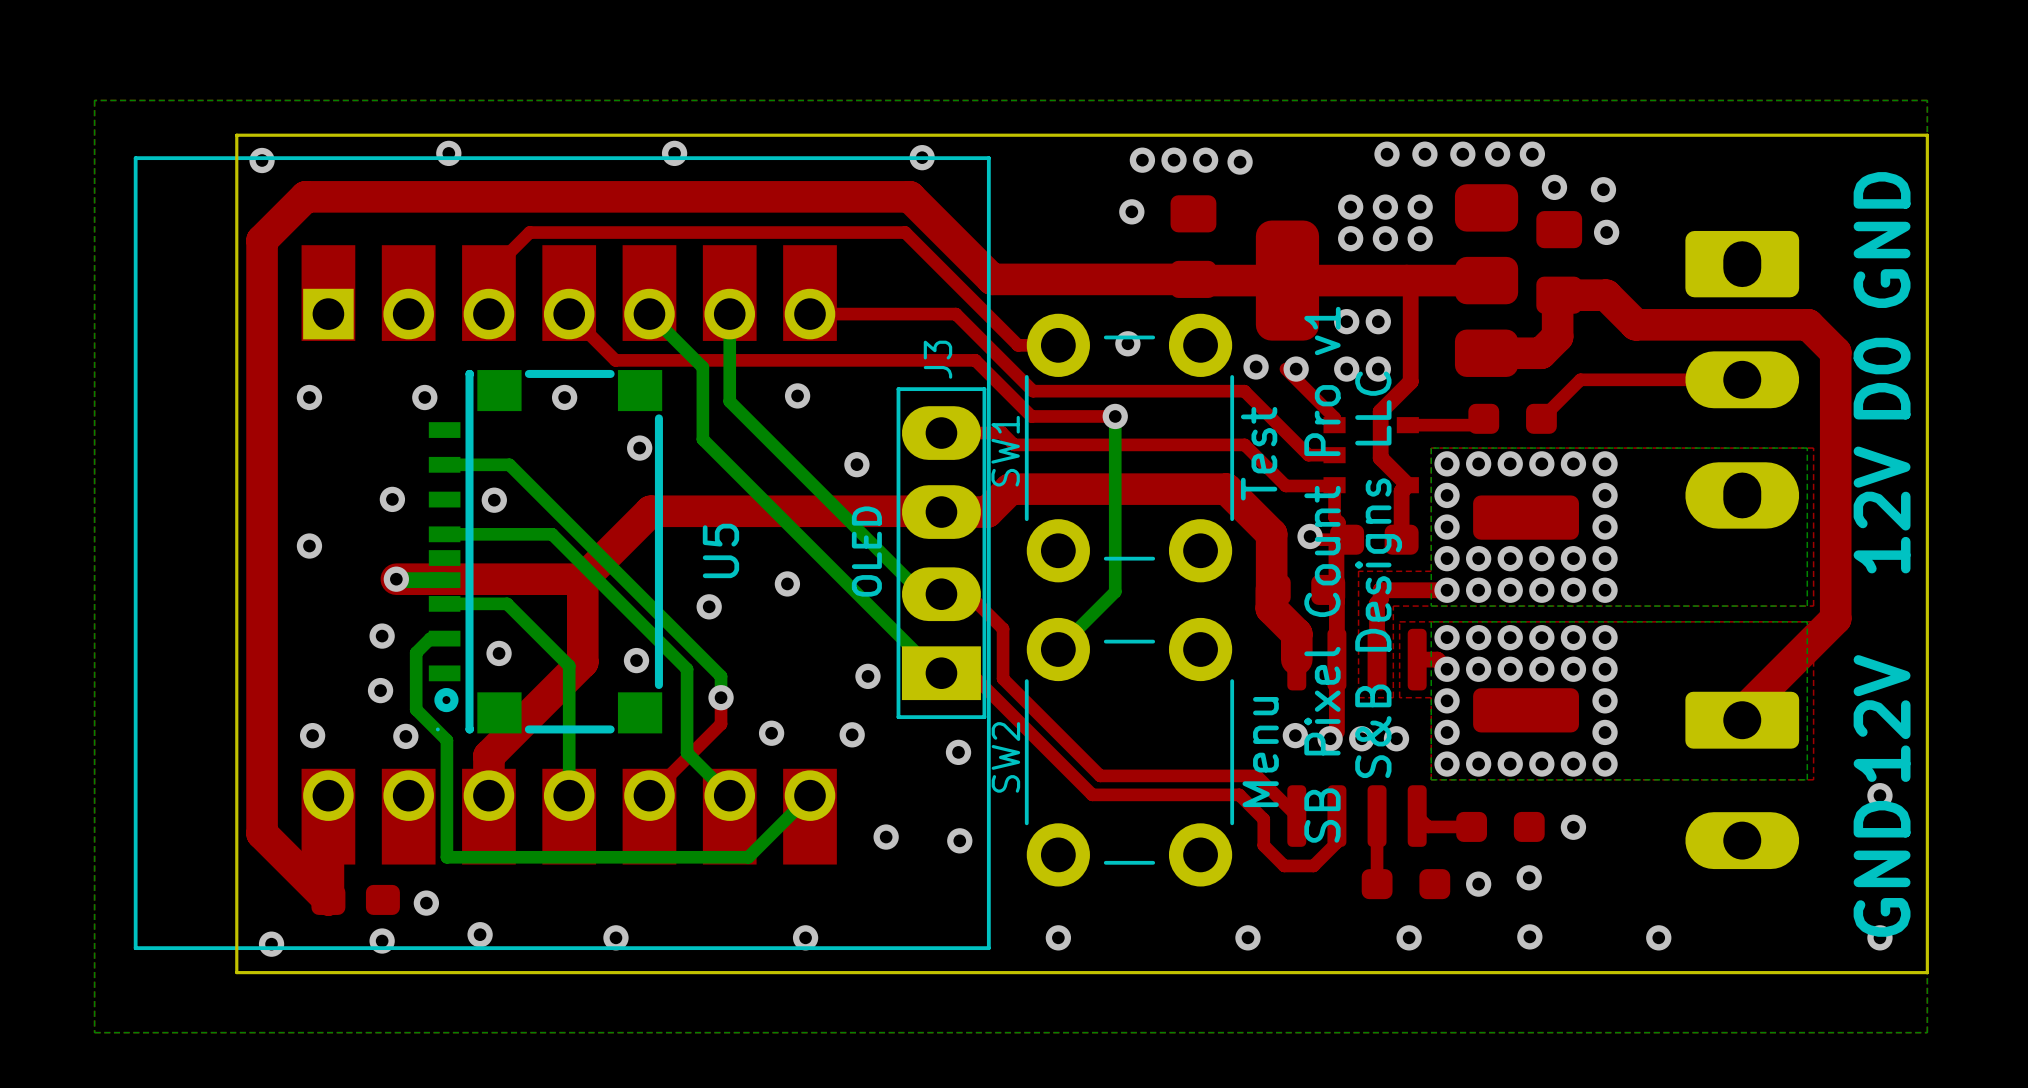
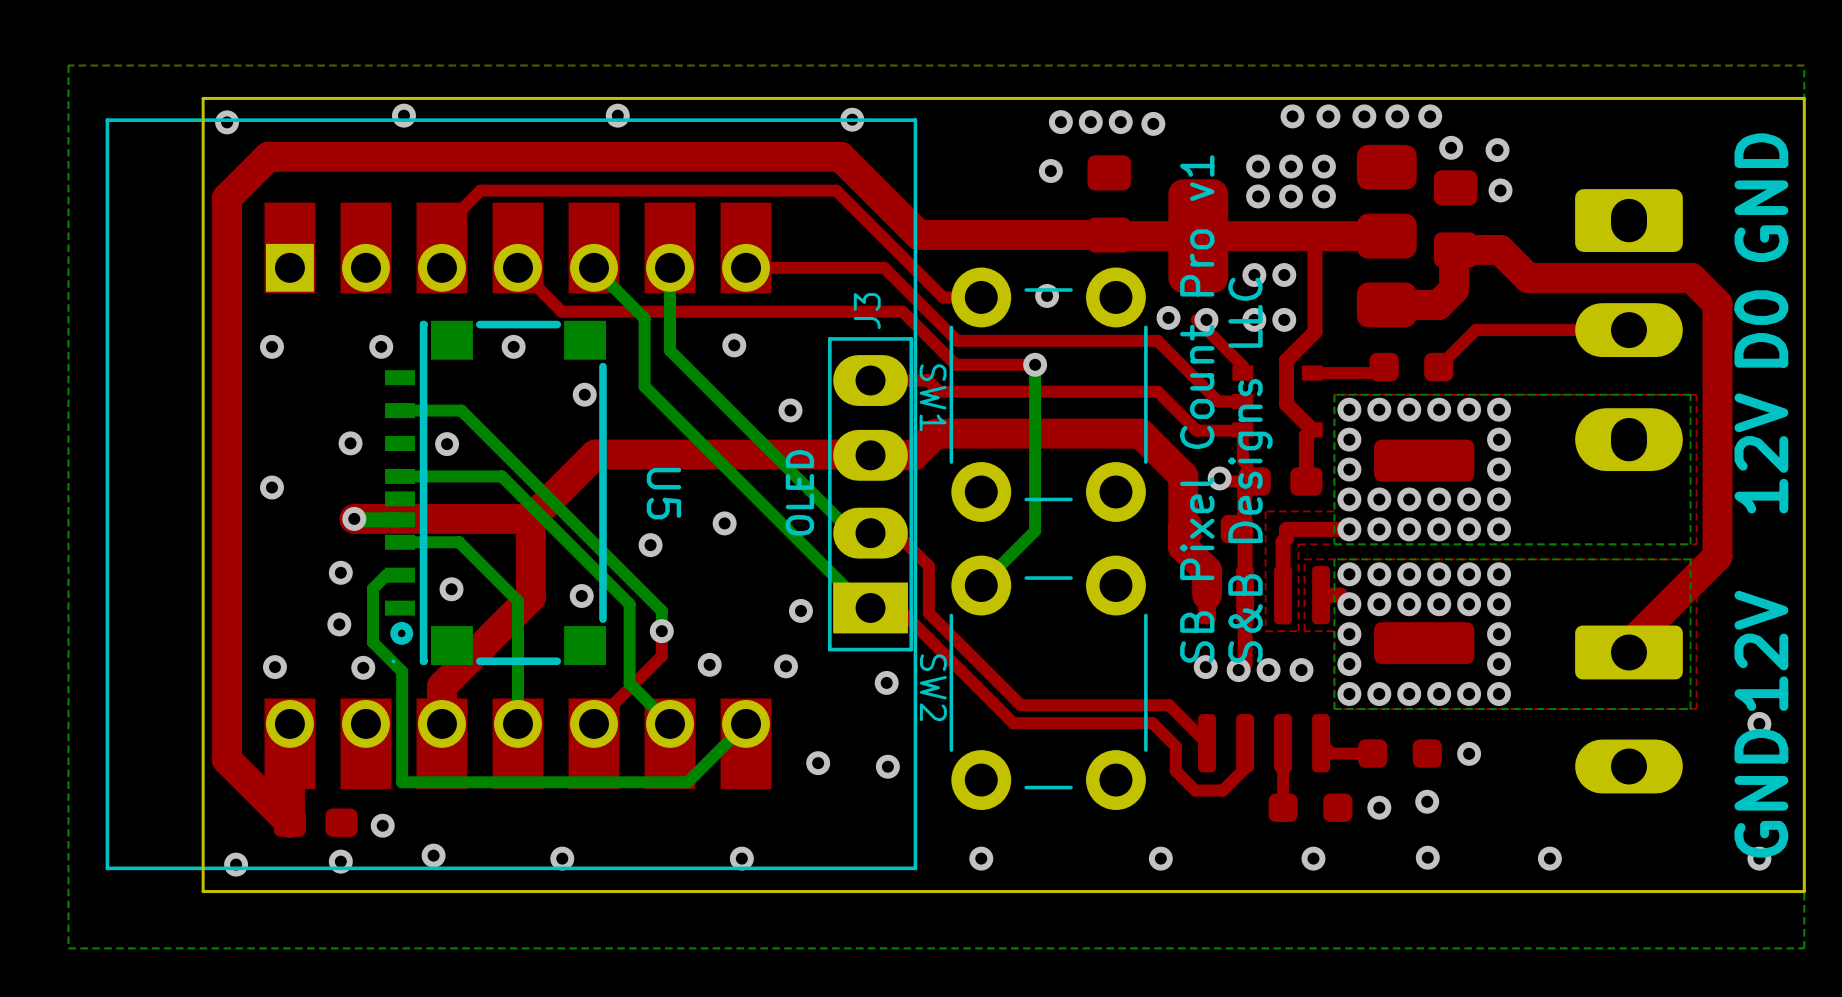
SW1 name rotation: 0° (1005, 451) -> 180° (933, 397)
SW1 value: Test (1259, 453) -> none
U5 name rotation: 0° (720, 550) -> 180° (663, 493)
text position: SB Pixel Count Pro v1 (1322, 574) -> SB Pixel Count Pro v1 (1197, 408)
text position: S&B Designs LLC (1378, 574) -> S&B Designs LLC (1250, 470)
SW2 value: Menu (1260, 752) -> none
SW2 name rotation: 0° (1005, 757) -> 180° (933, 687)

